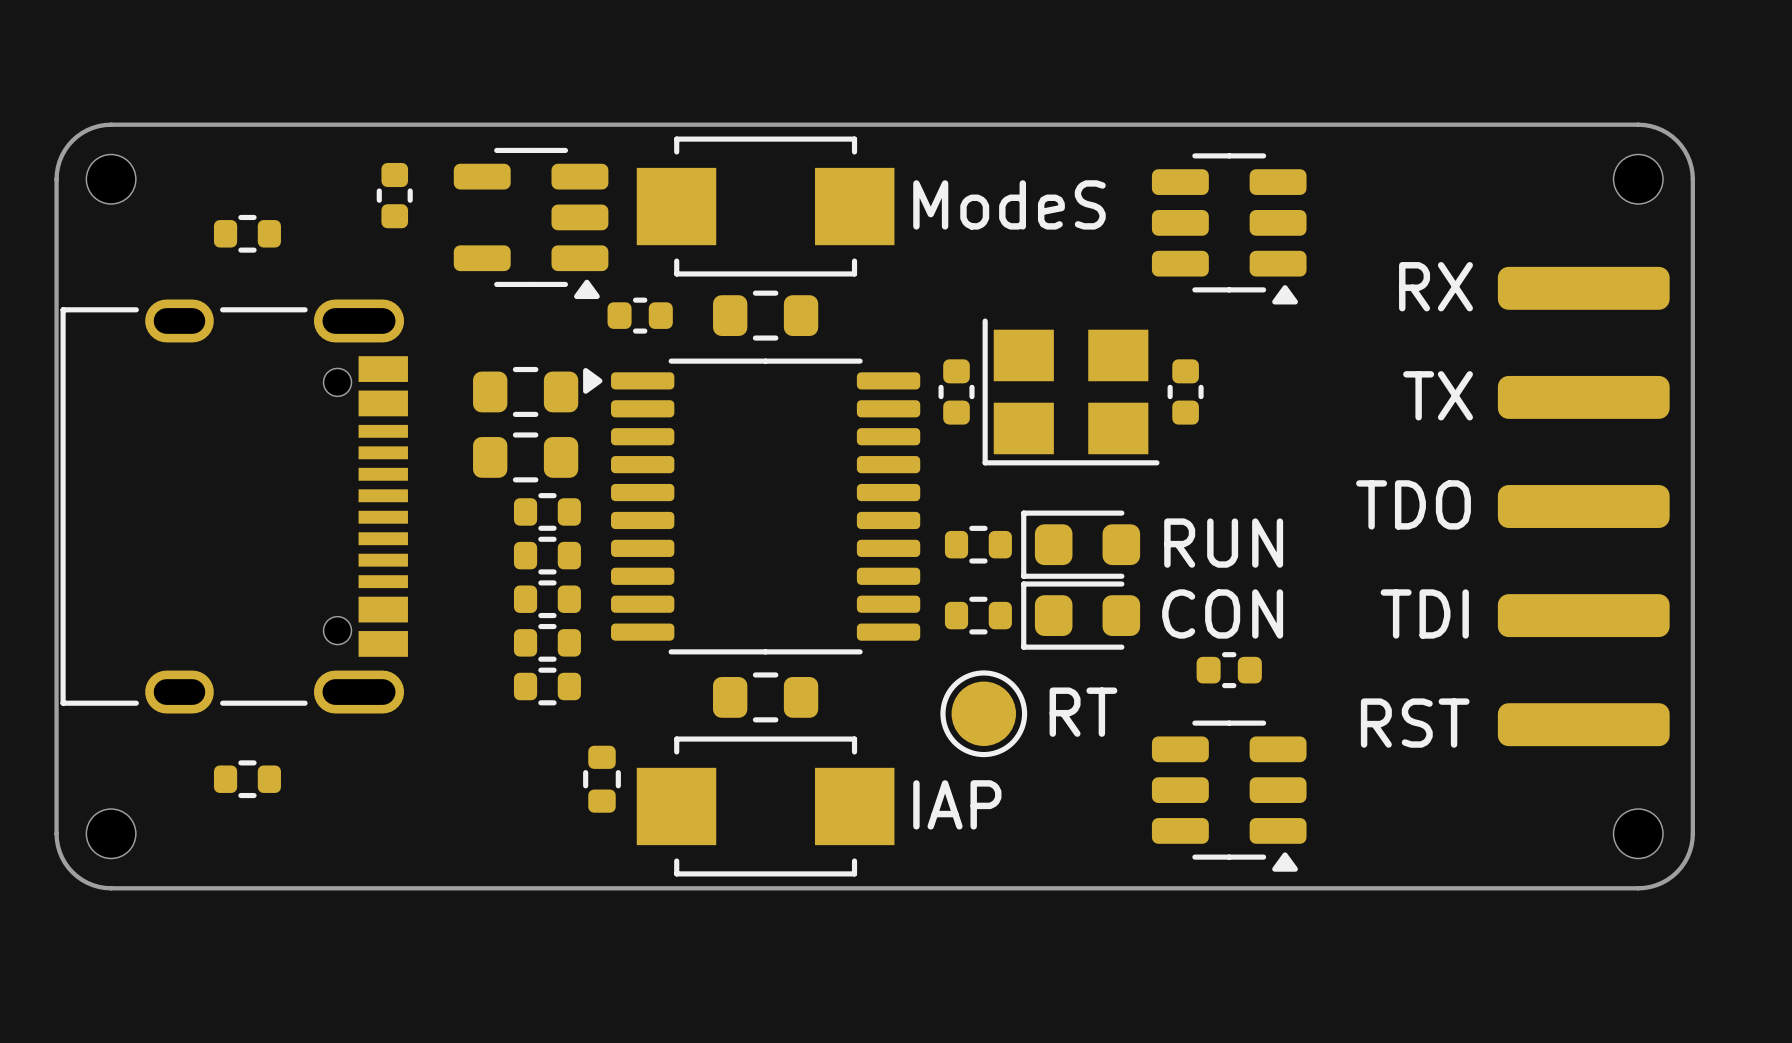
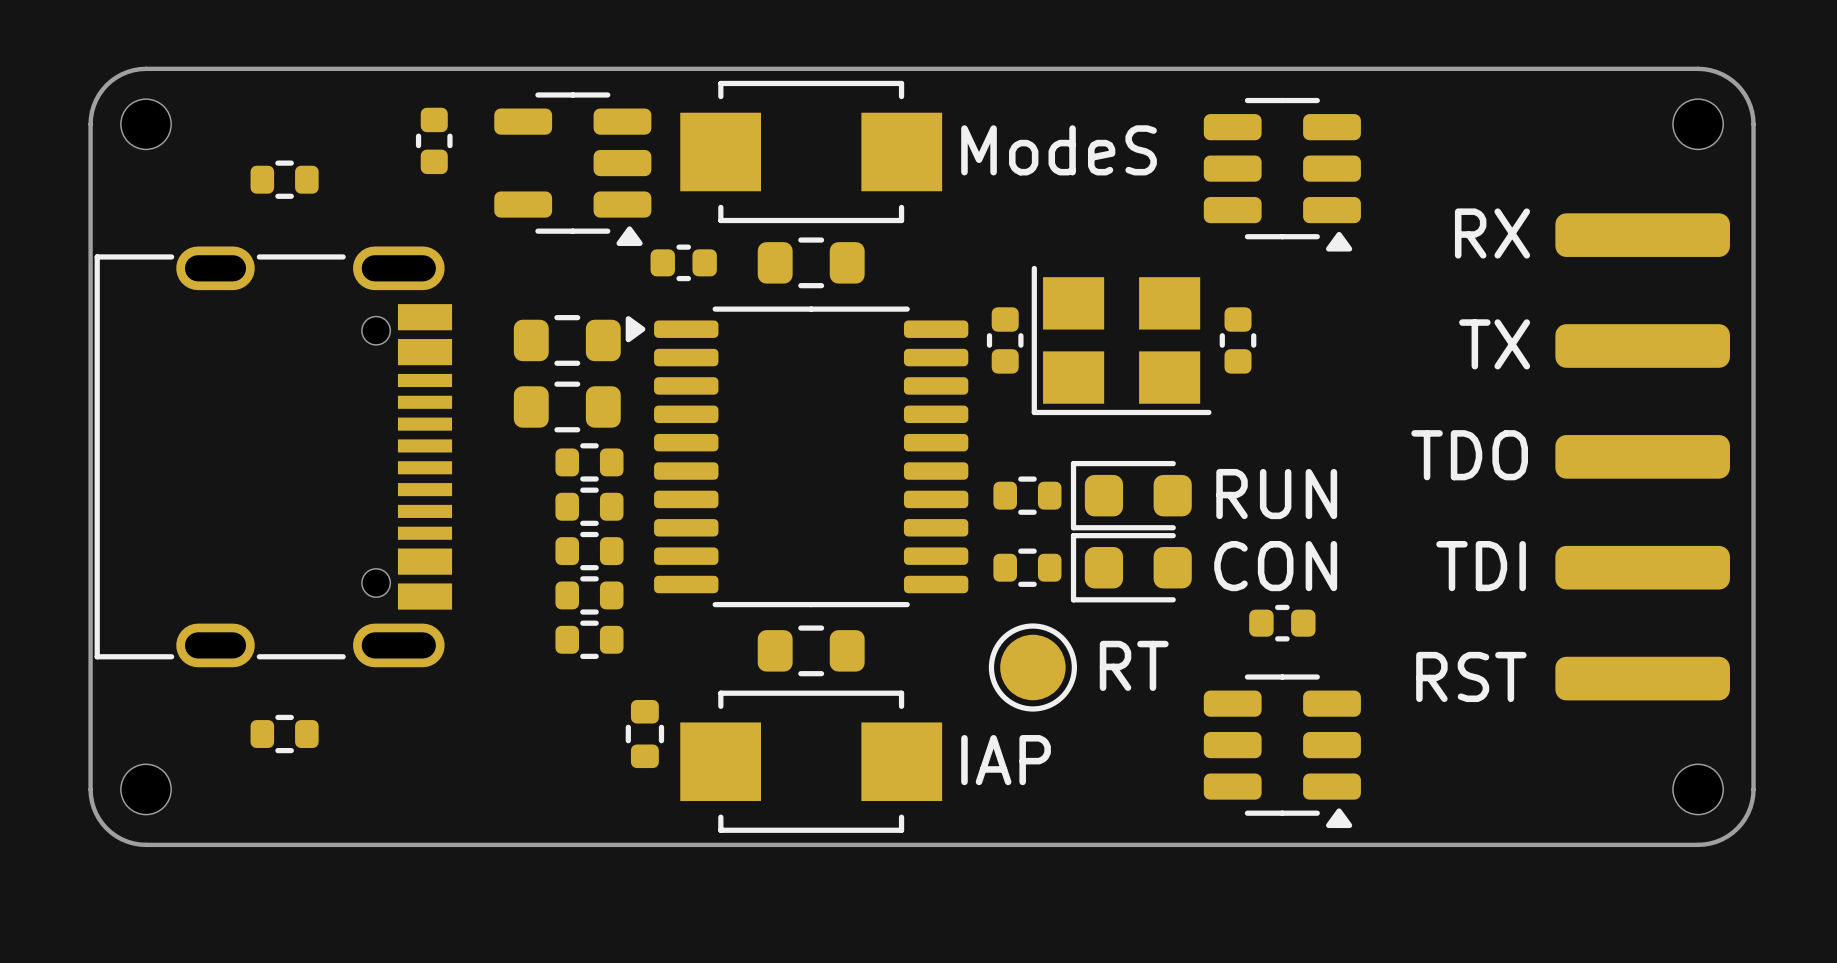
part footprint: [60, 299, 408, 714] -> [94, 246, 453, 668]

